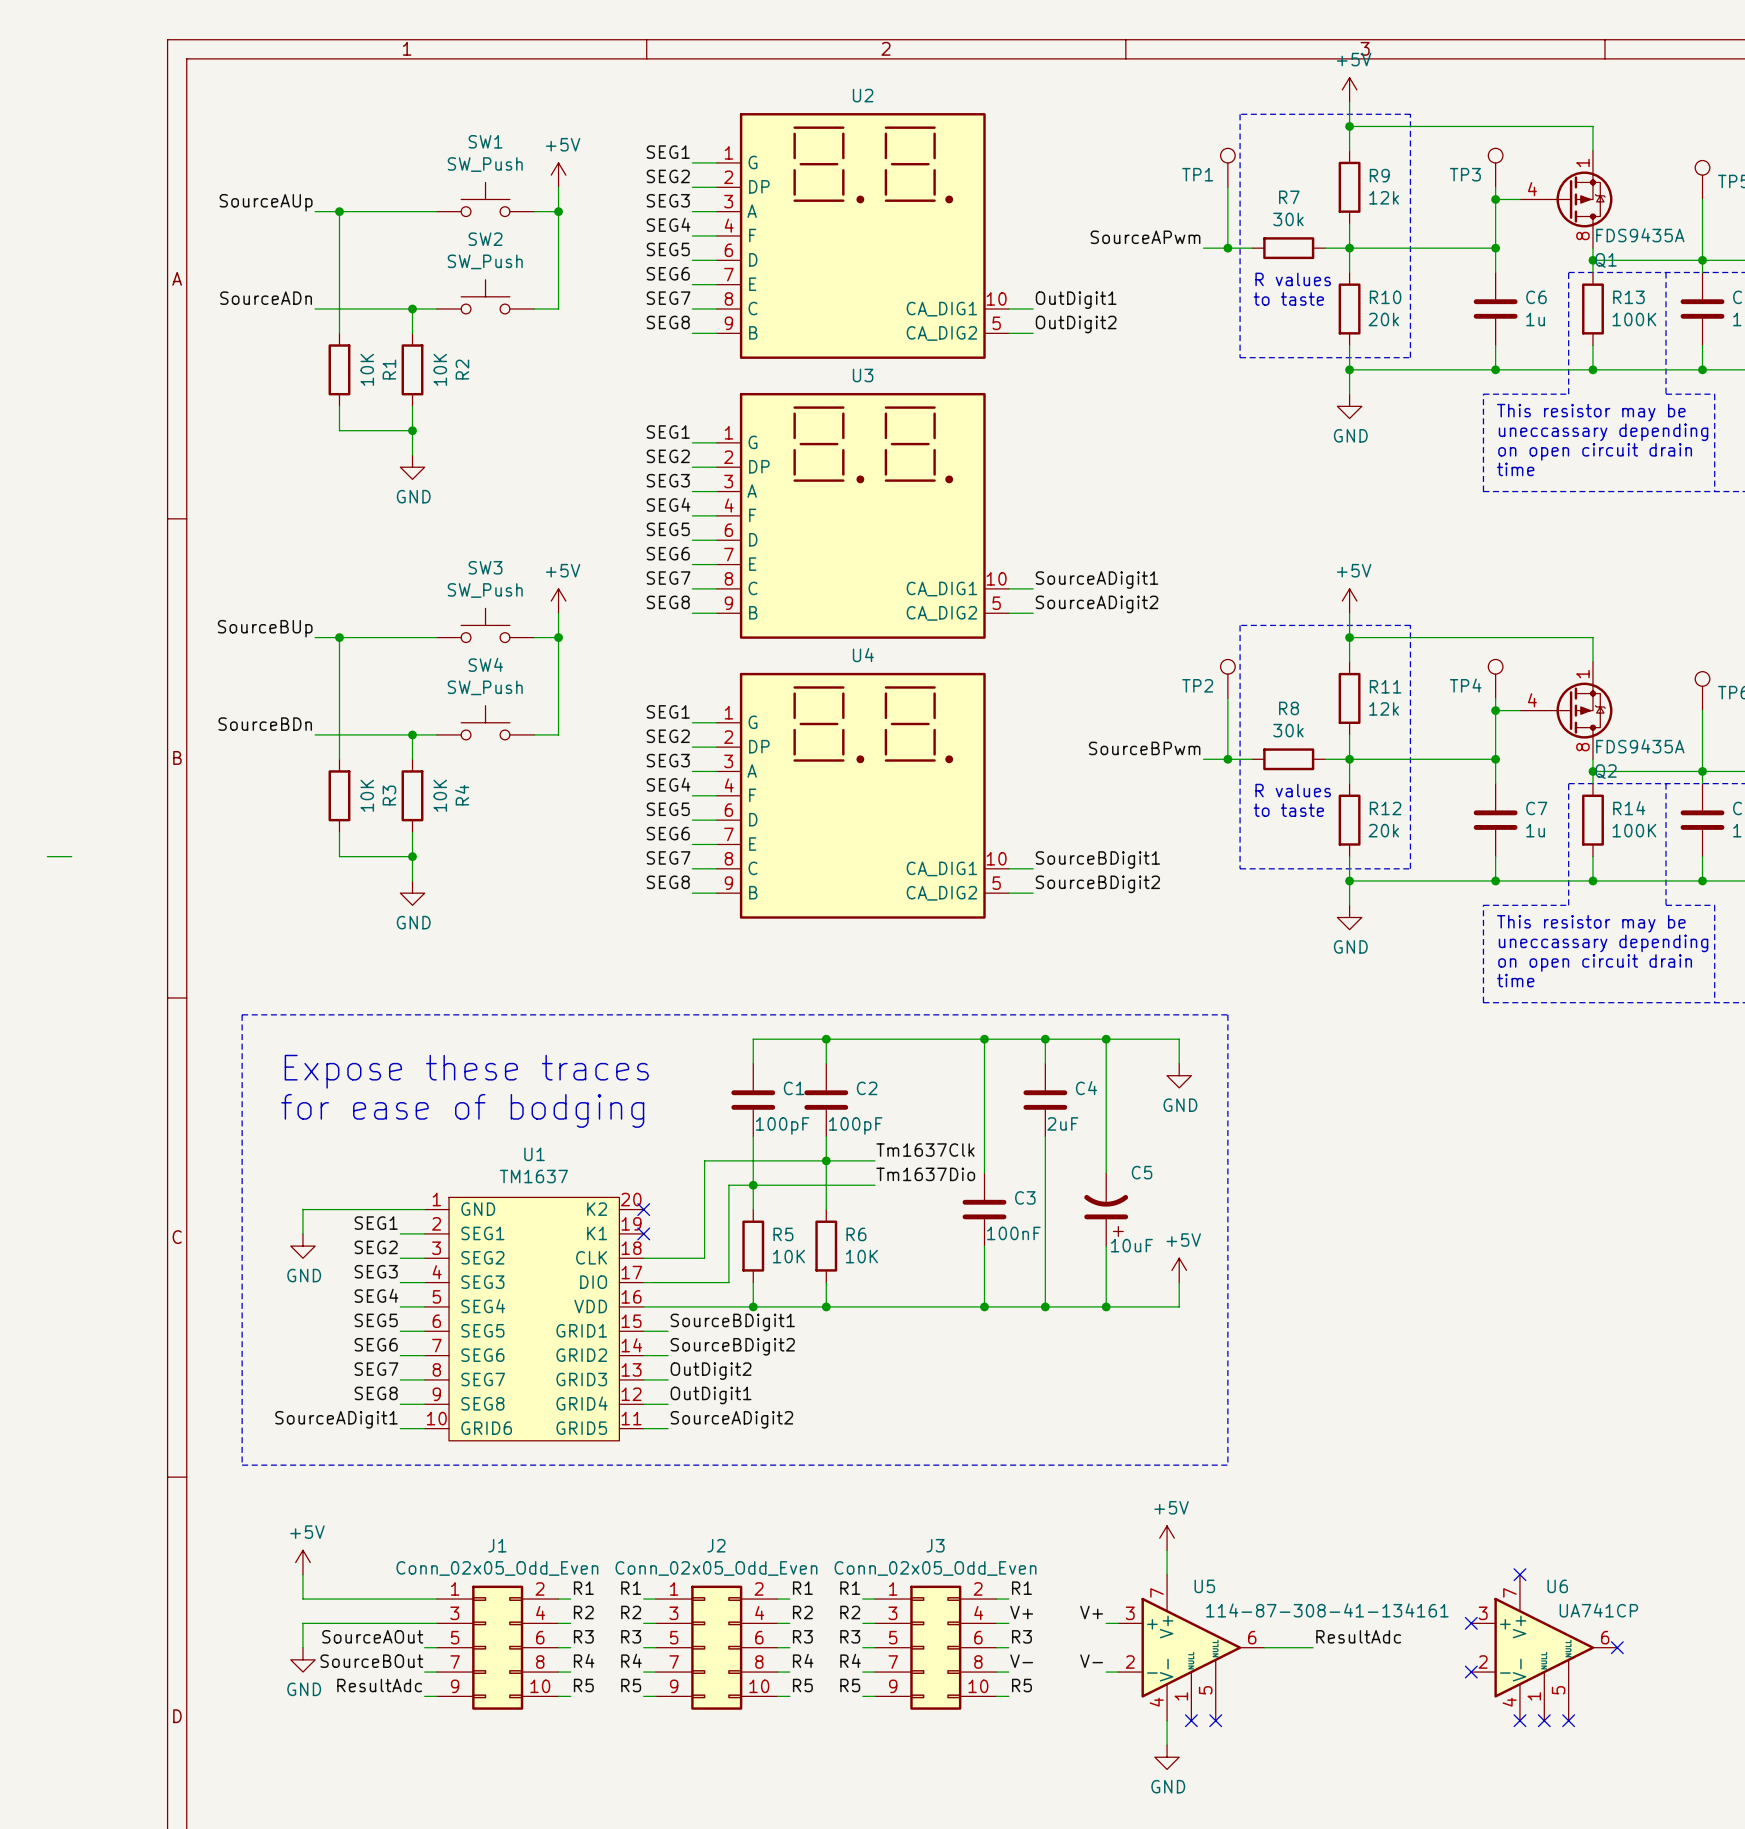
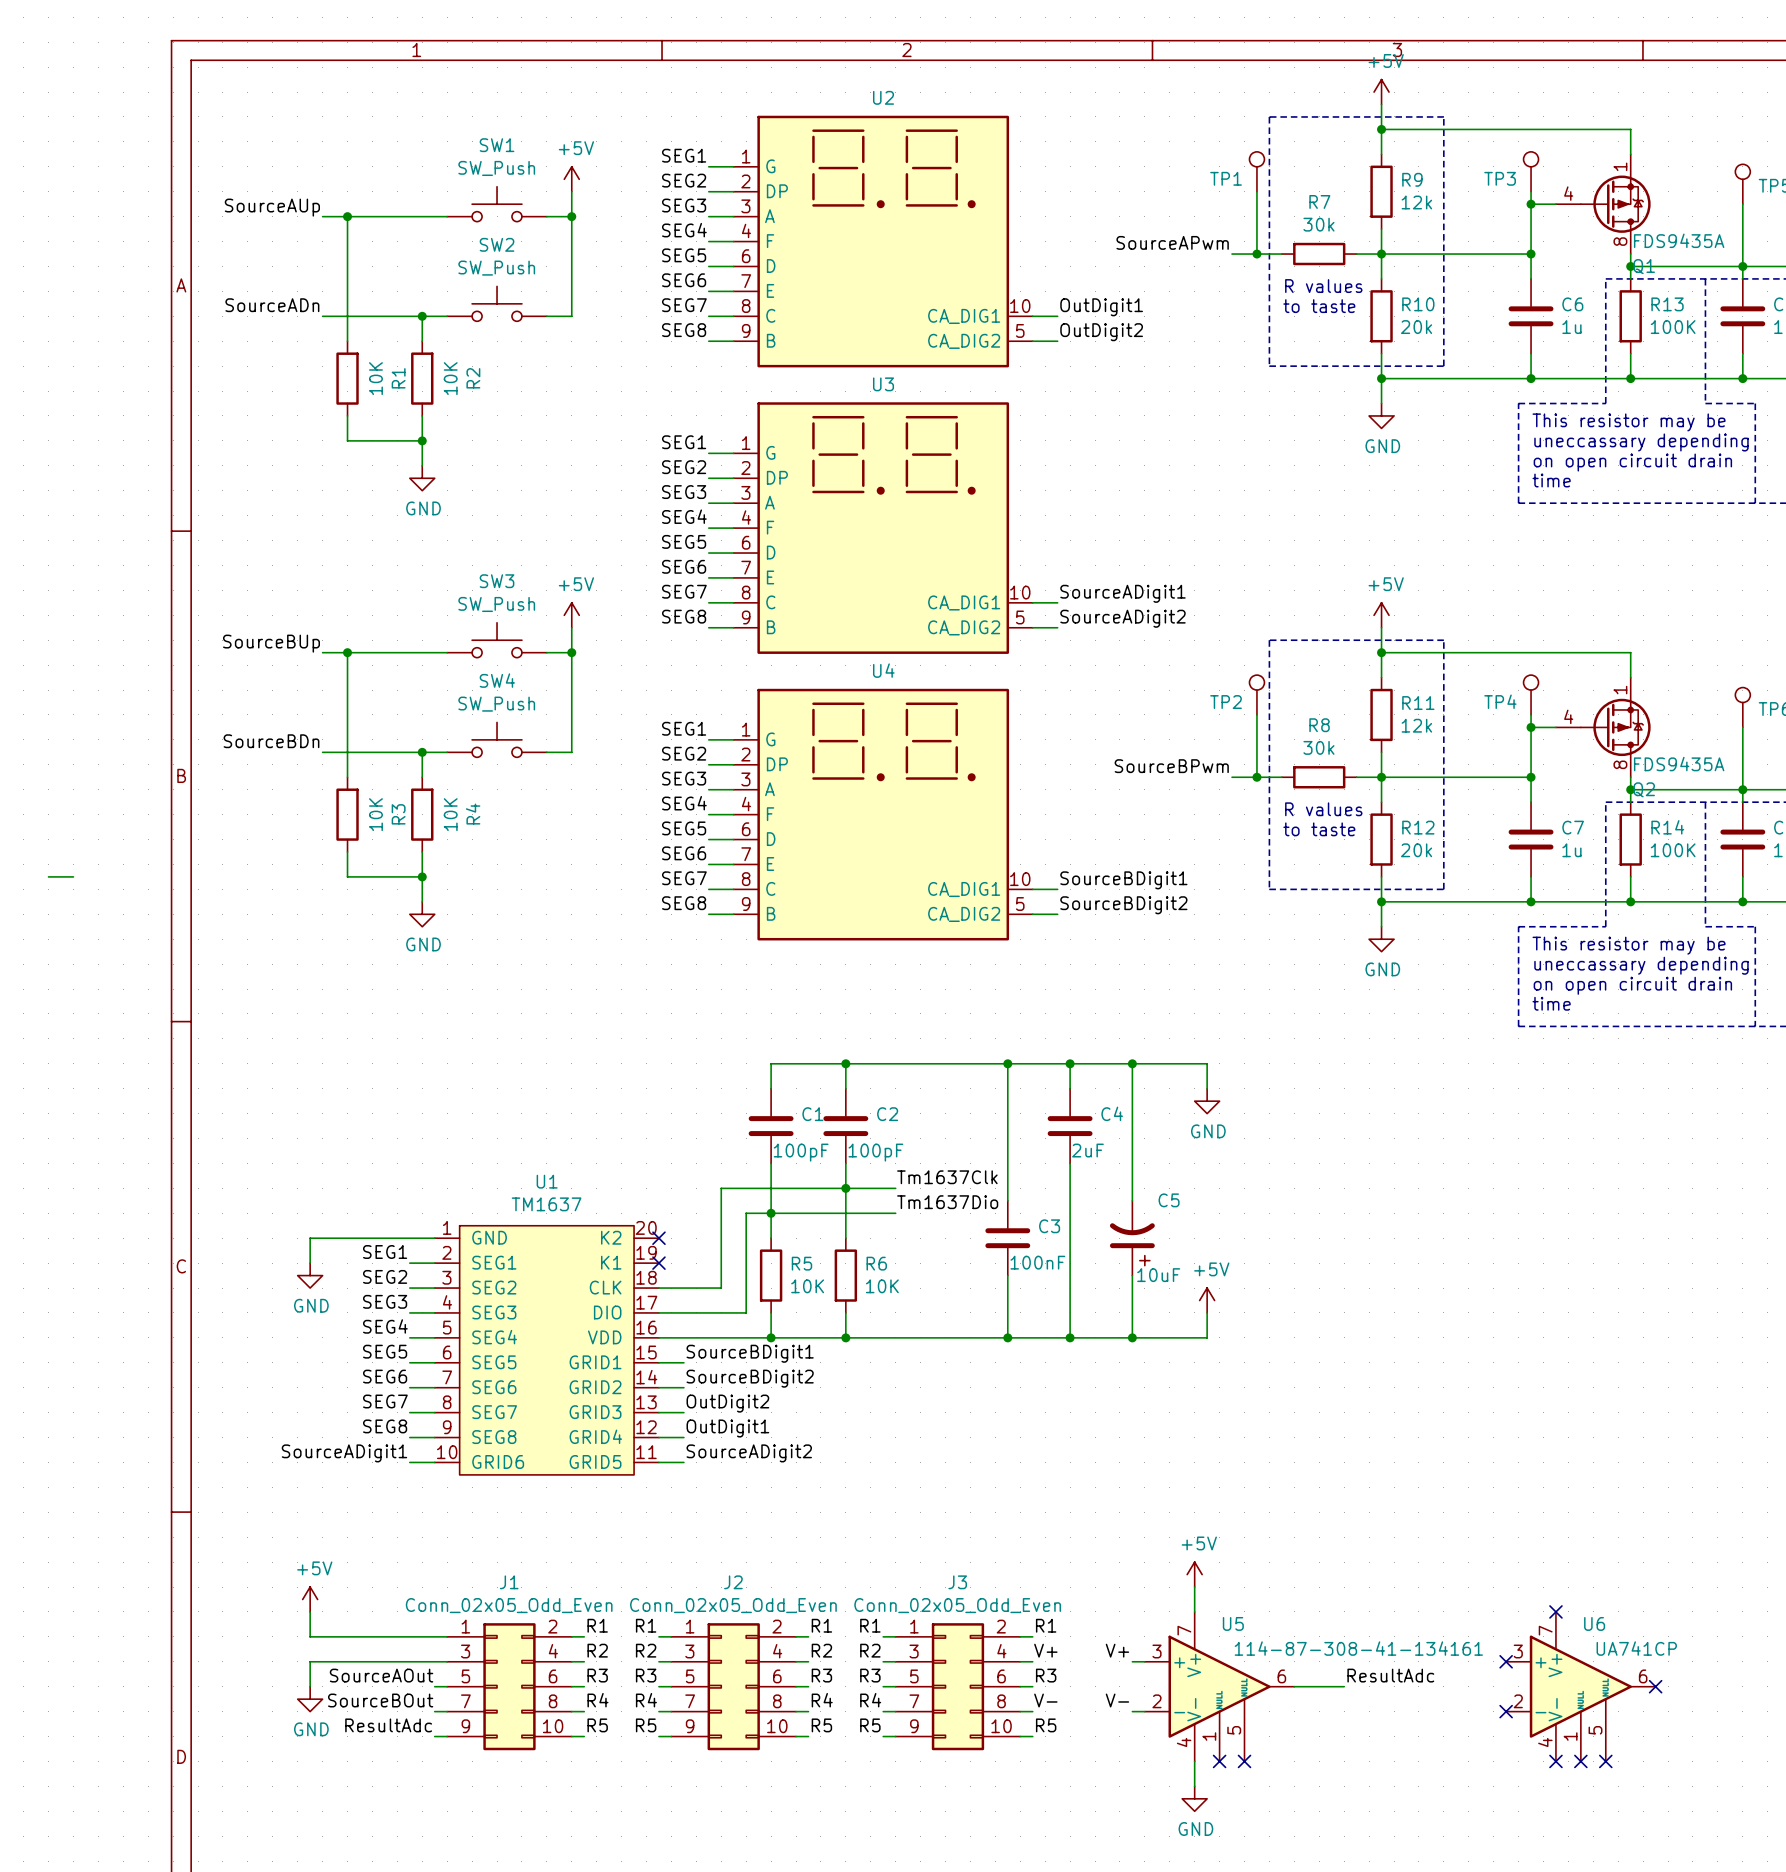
line: (242, 1014) (1227, 1014) (1227, 1465) (242, 1465) (242, 1014) -> none
text: Expose these traces (466, 1071) -> none
text: for ease of bodging (462, 1110) -> none

